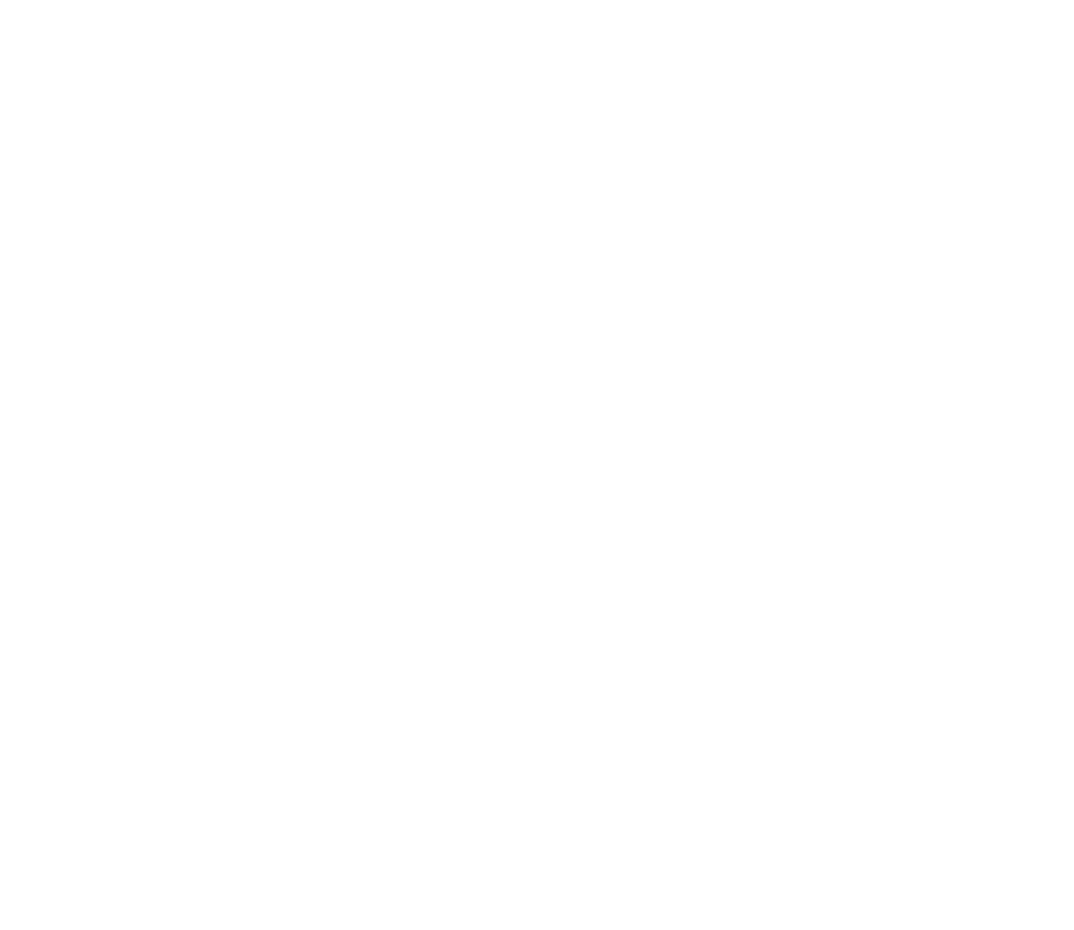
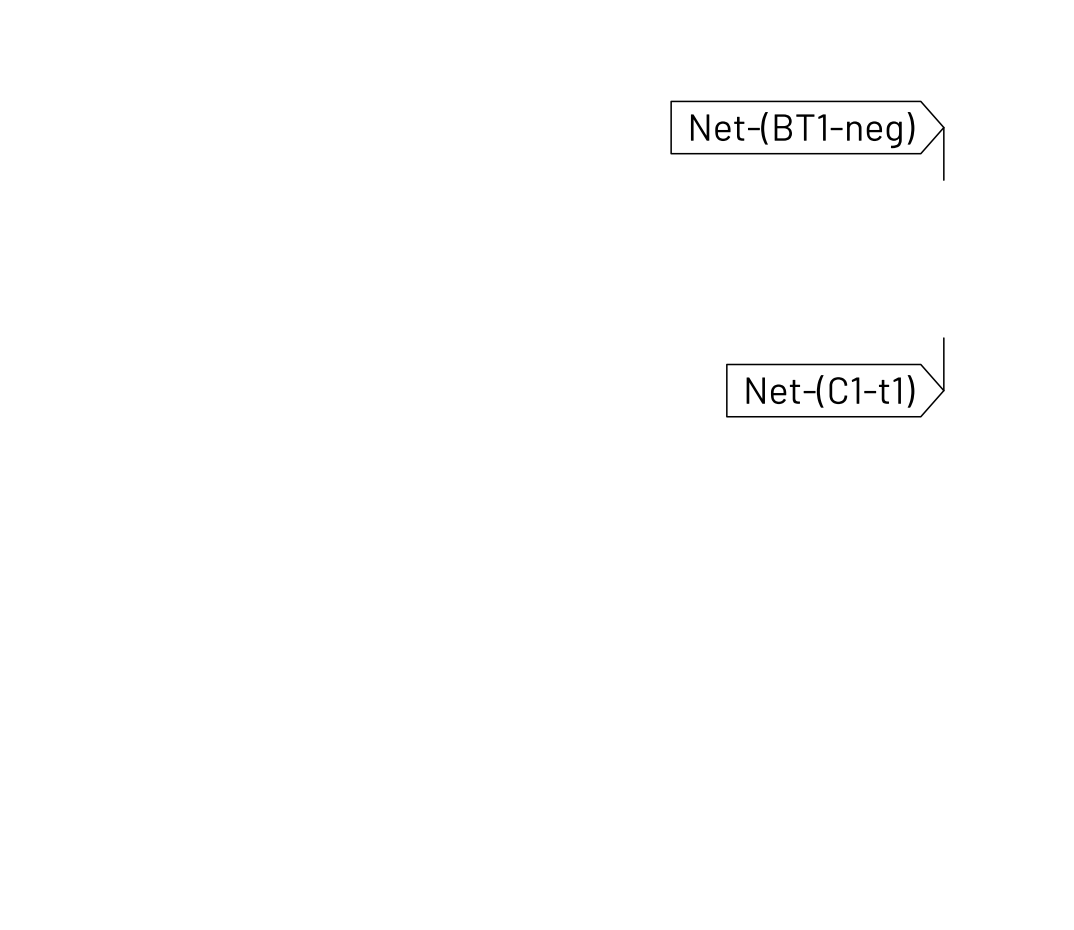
wire: none -> (943, 127) (943, 180)
global label: none -> Net-(BT1-neg) (802, 130)
wire: none -> (943, 338) (943, 390)
global label: none -> Net-(C1-t1) (830, 391)

